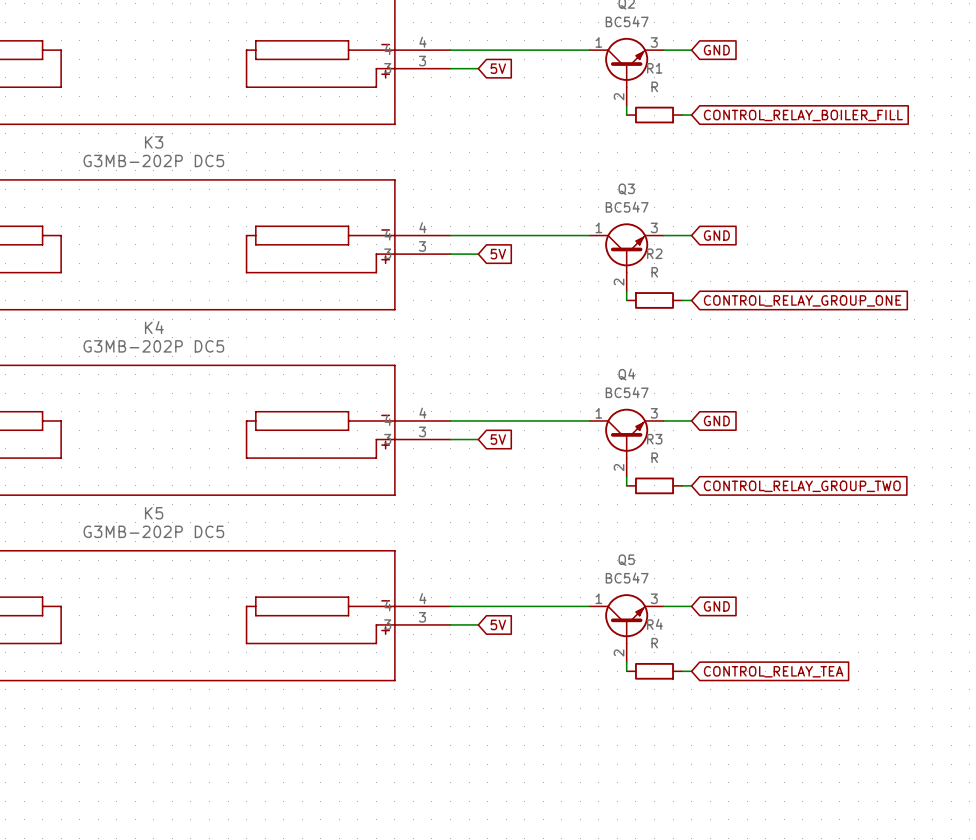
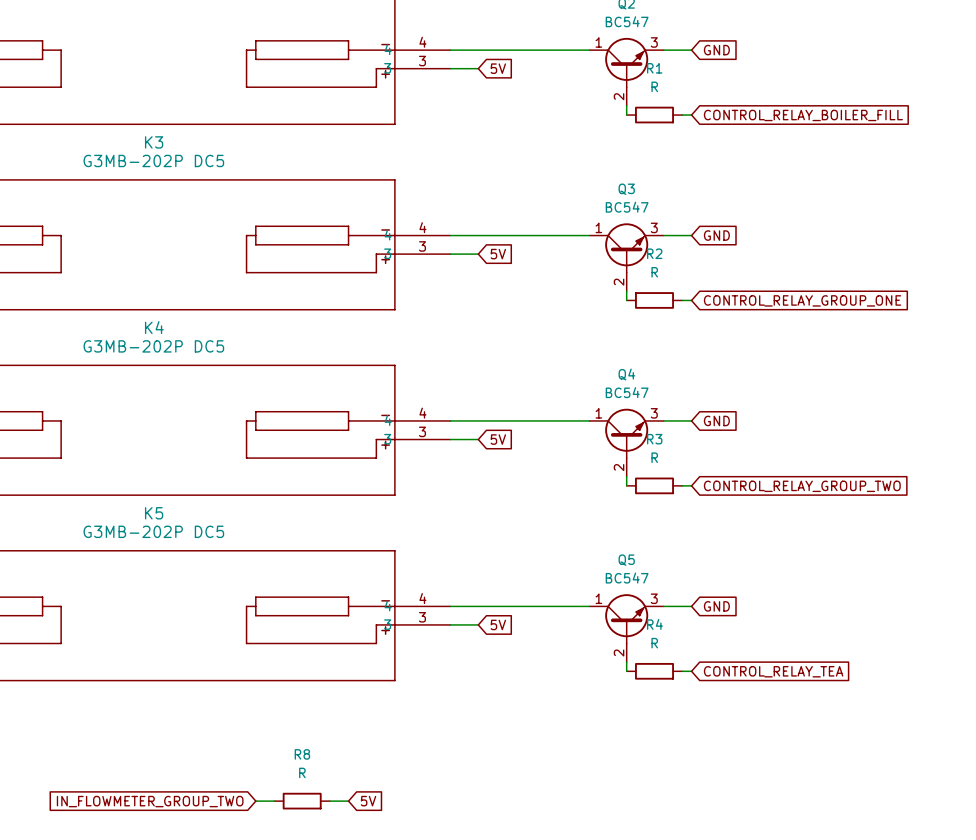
global label: none -> IN_FLOWMETER_GROUP_TWO (150, 801)
wire: none -> (255, 801) (274, 801)
R8: none -> R (302, 801)
wire: none -> (329, 801) (348, 801)
global label: none -> 5V (368, 801)

